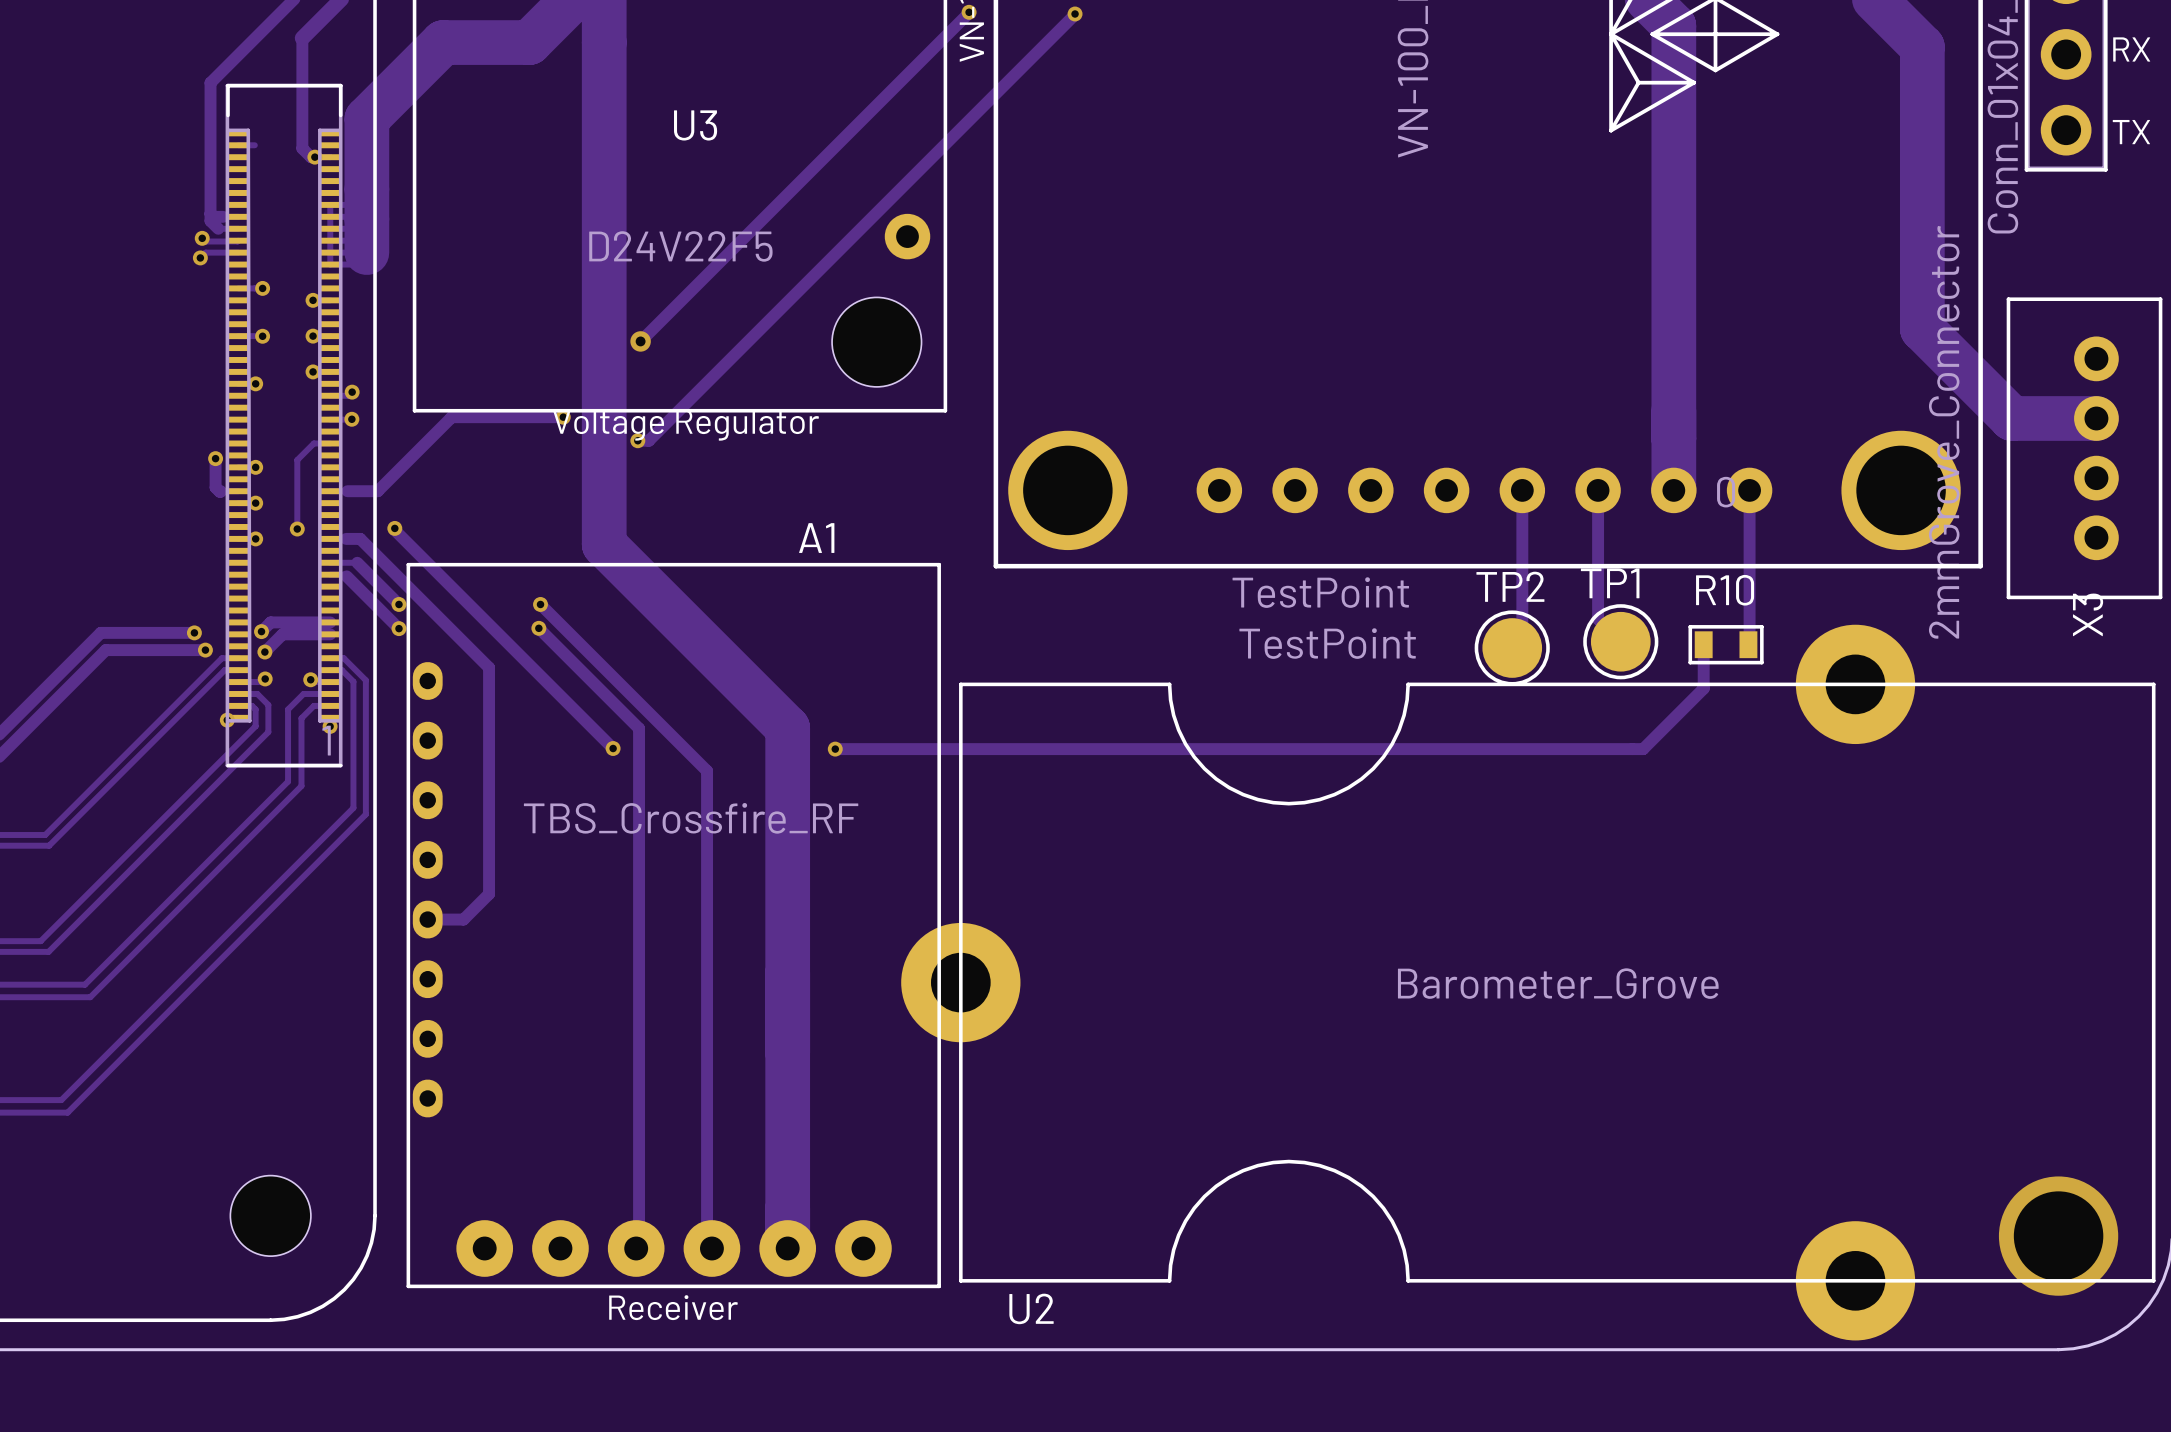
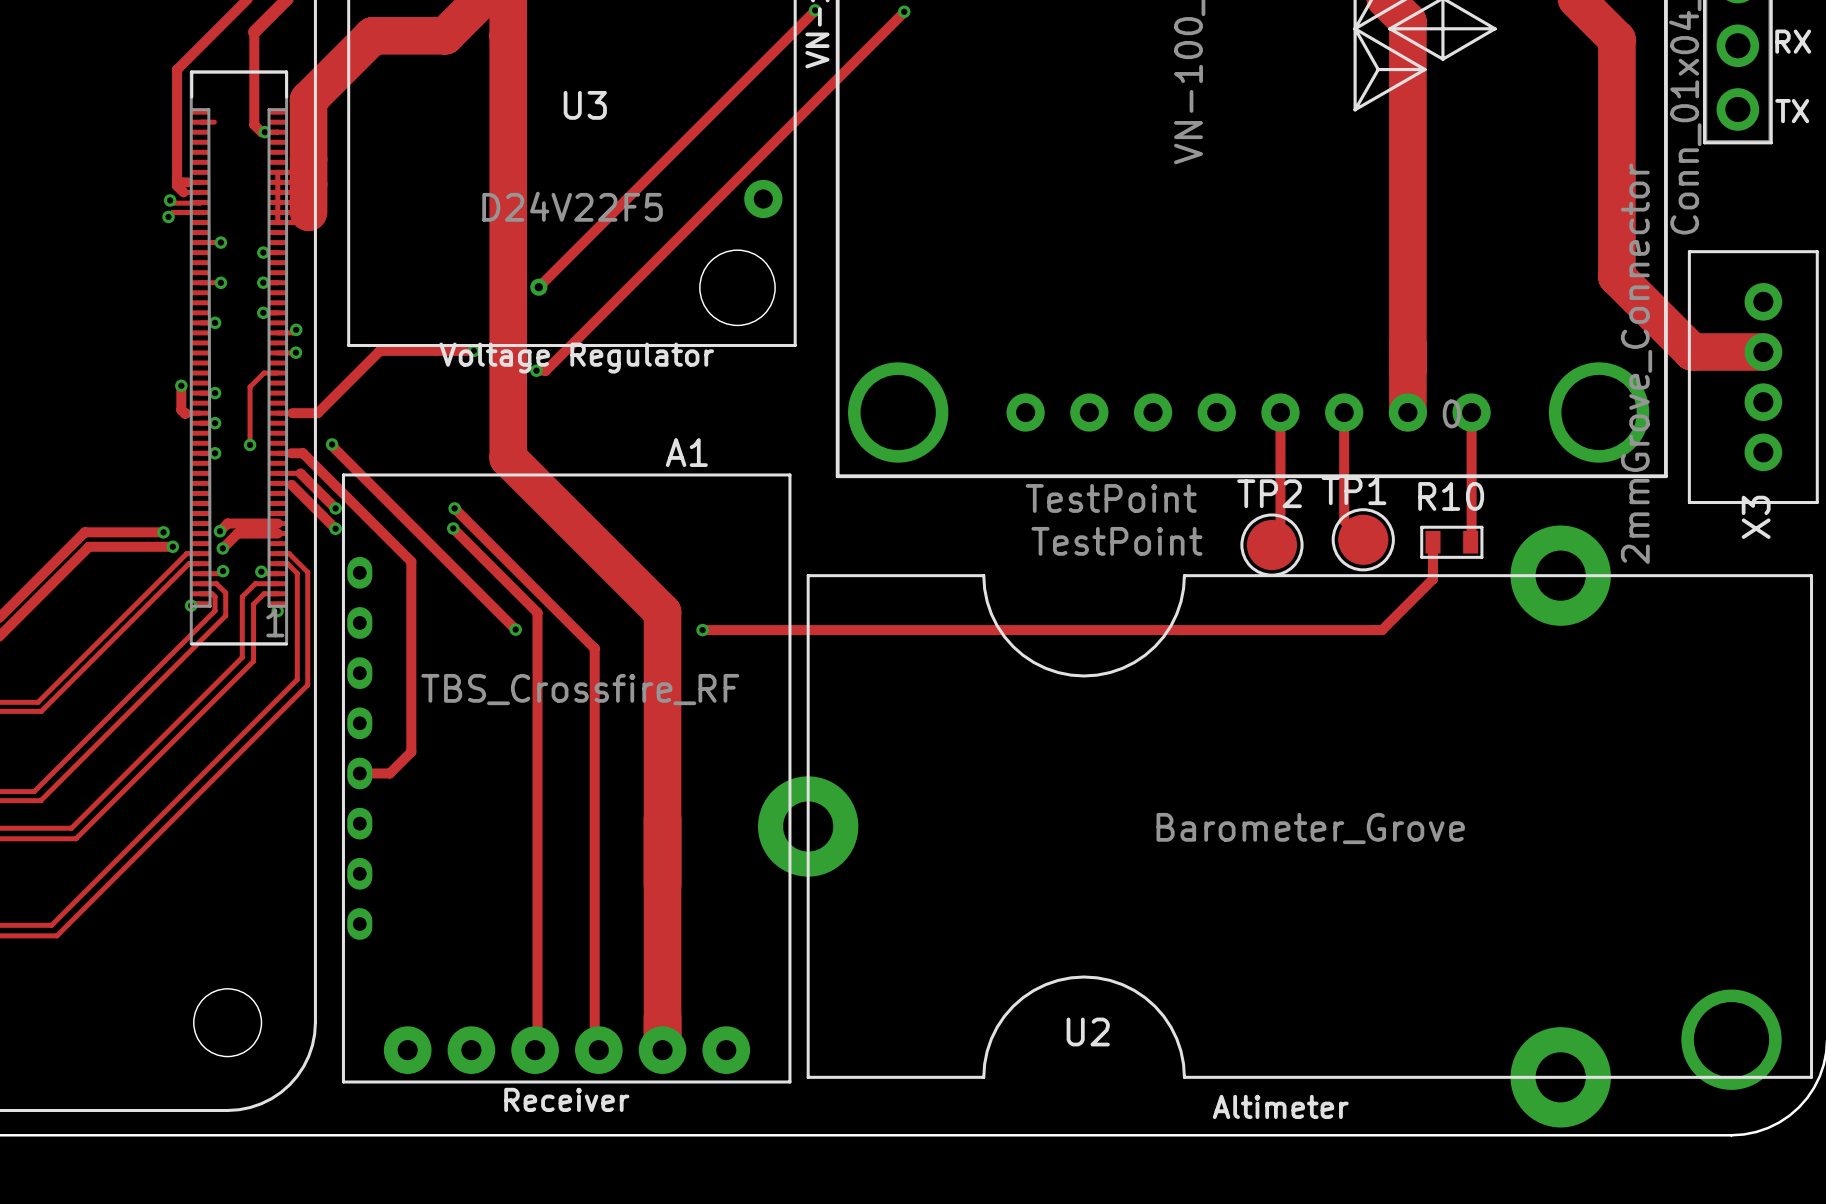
U2 name position: U2 (1031, 1308) -> U2 (1088, 1031)
text: none -> Altimeter (1280, 1106)

